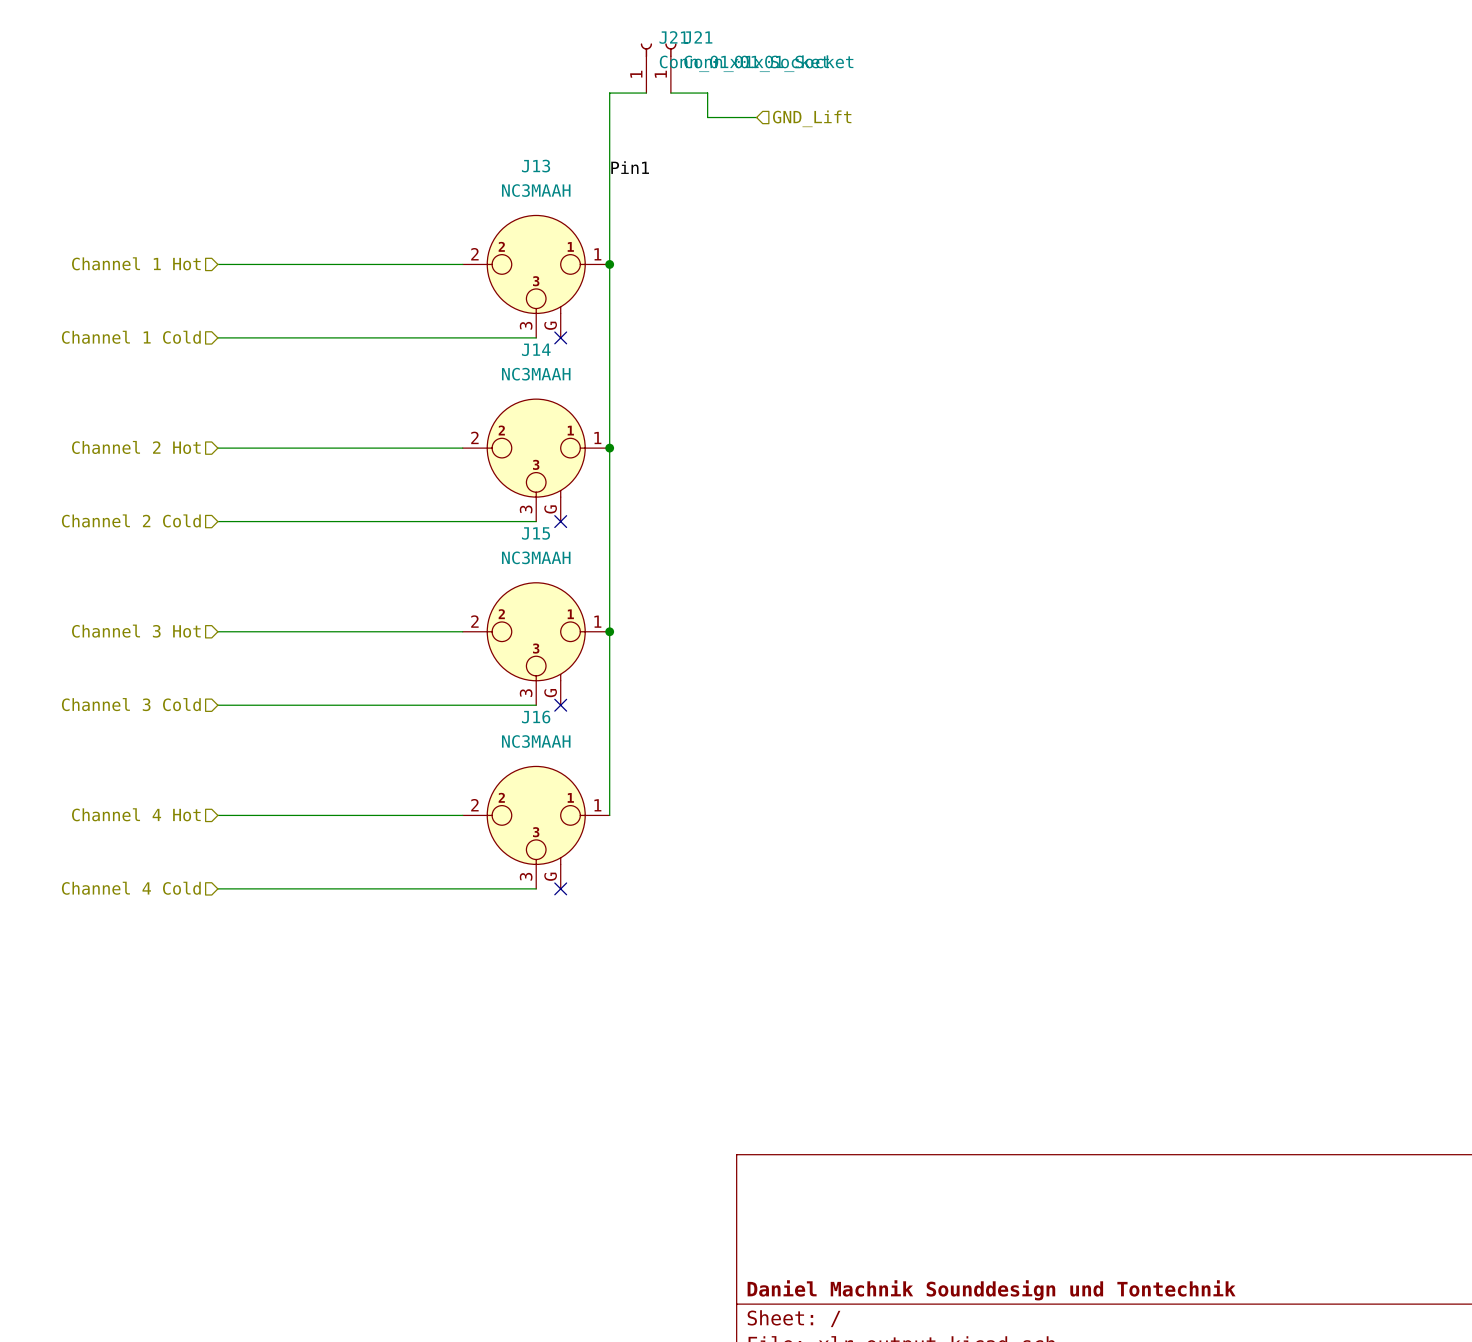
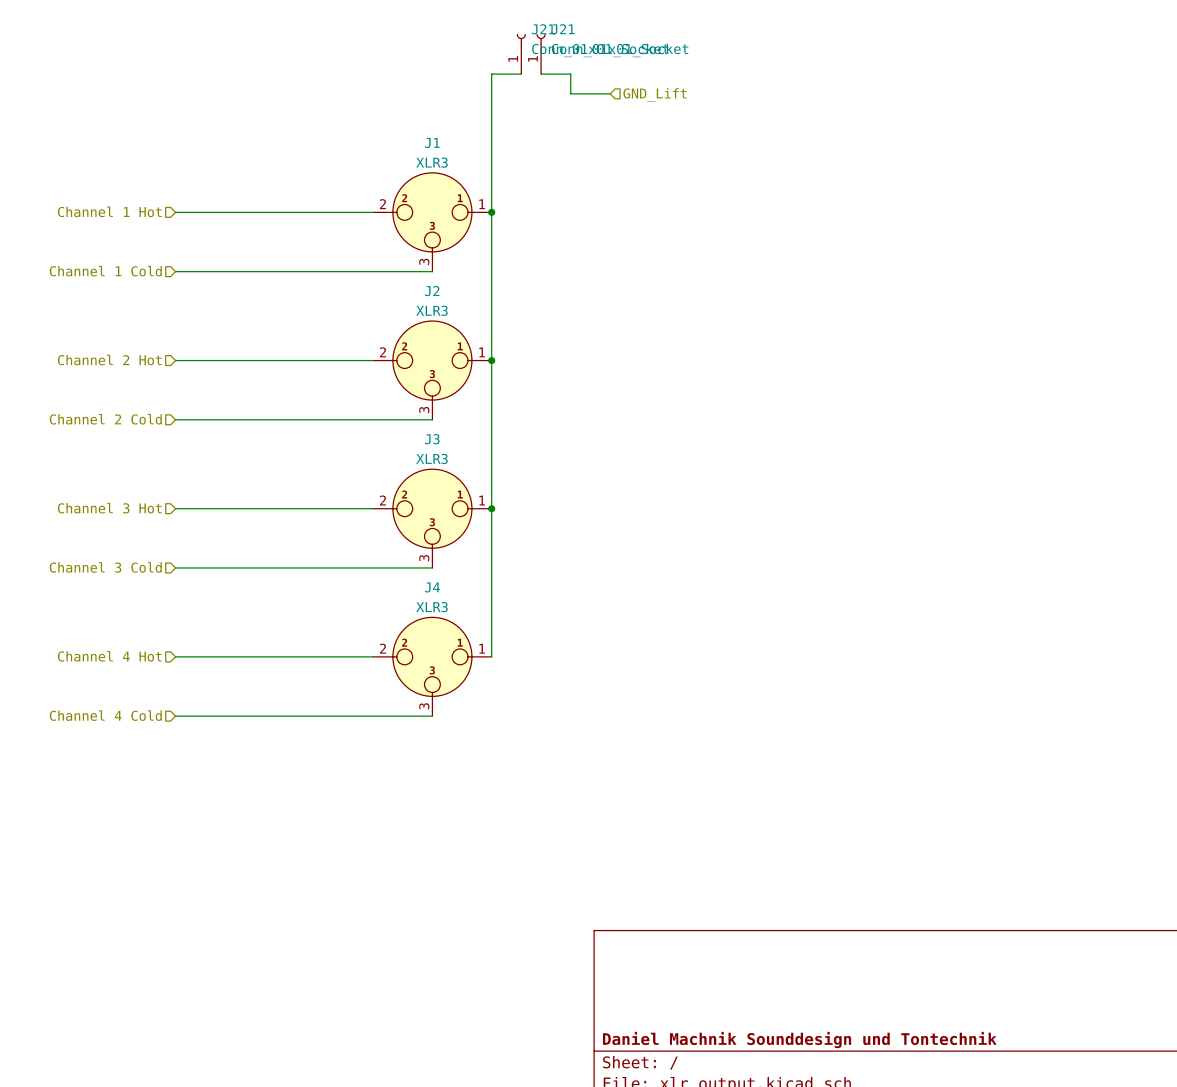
label: Pin1 (630, 167) -> none
J13: NC3MAAH (536, 276) -> none
J1: none -> XLR3 (432, 222)
no-connect mark: (560, 337) -> none
J14: NC3MAAH (536, 460) -> none
J2: none -> XLR3 (432, 370)
no-connect mark: (560, 521) -> none
J15: NC3MAAH (536, 644) -> none
J3: none -> XLR3 (432, 518)
no-connect mark: (560, 705) -> none
J16: NC3MAAH (536, 827) -> none
J4: none -> XLR3 (432, 666)
no-connect mark: (560, 888) -> none

